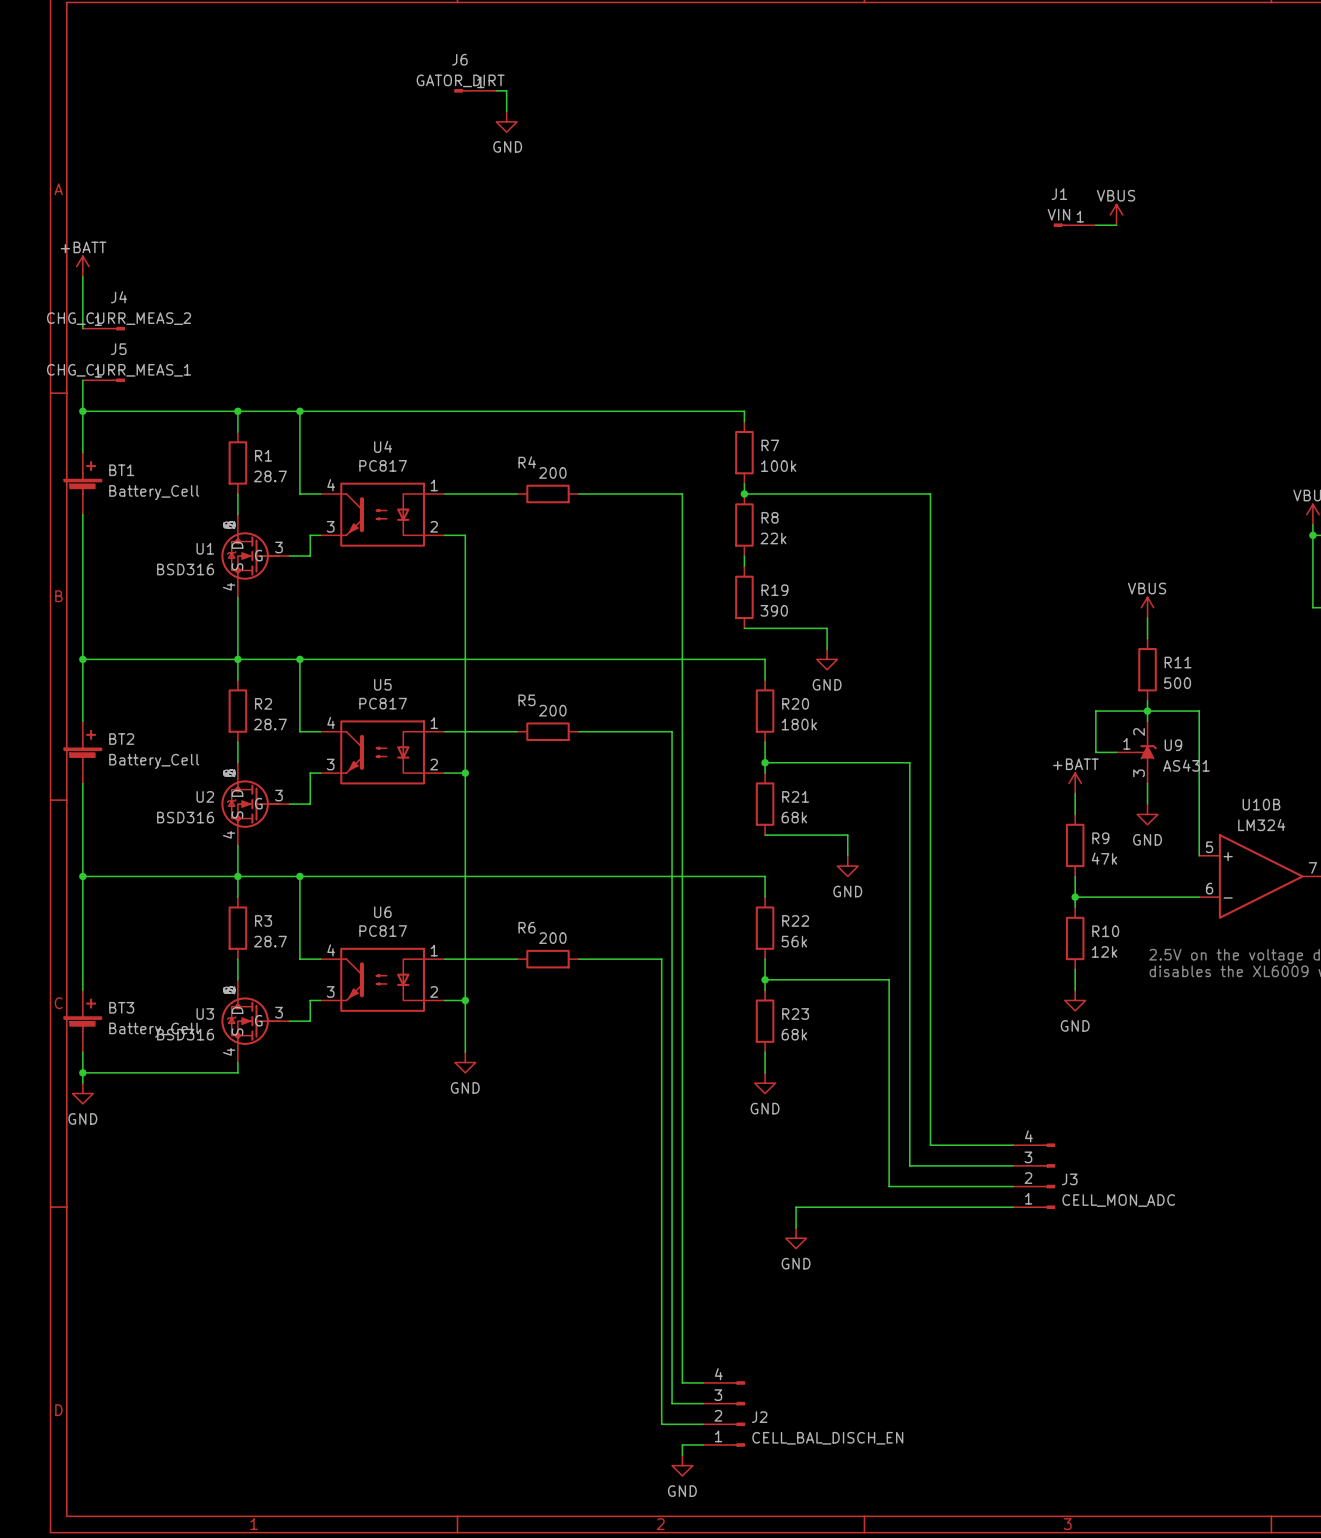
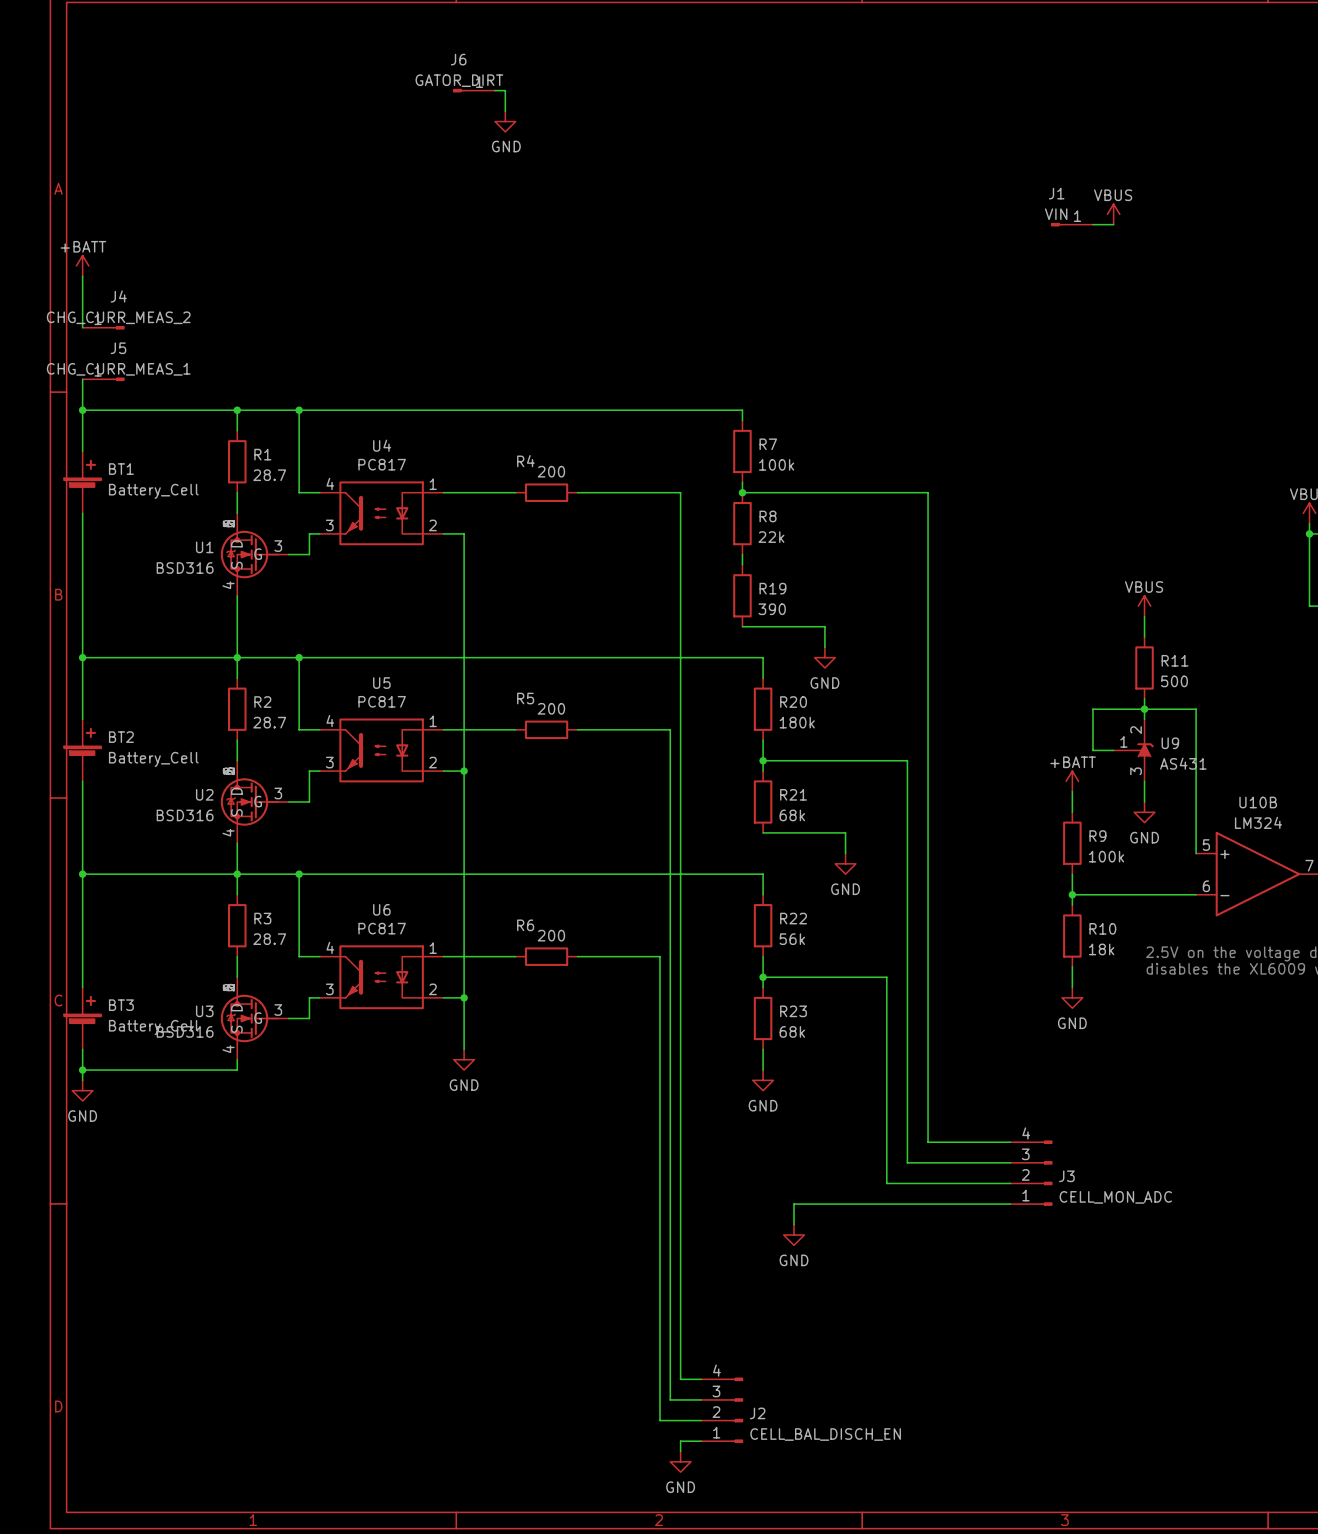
R9 value: 47k (1104, 858) -> 100k (1106, 856)
R10 value: 12k (1104, 951) -> 18k (1101, 949)

